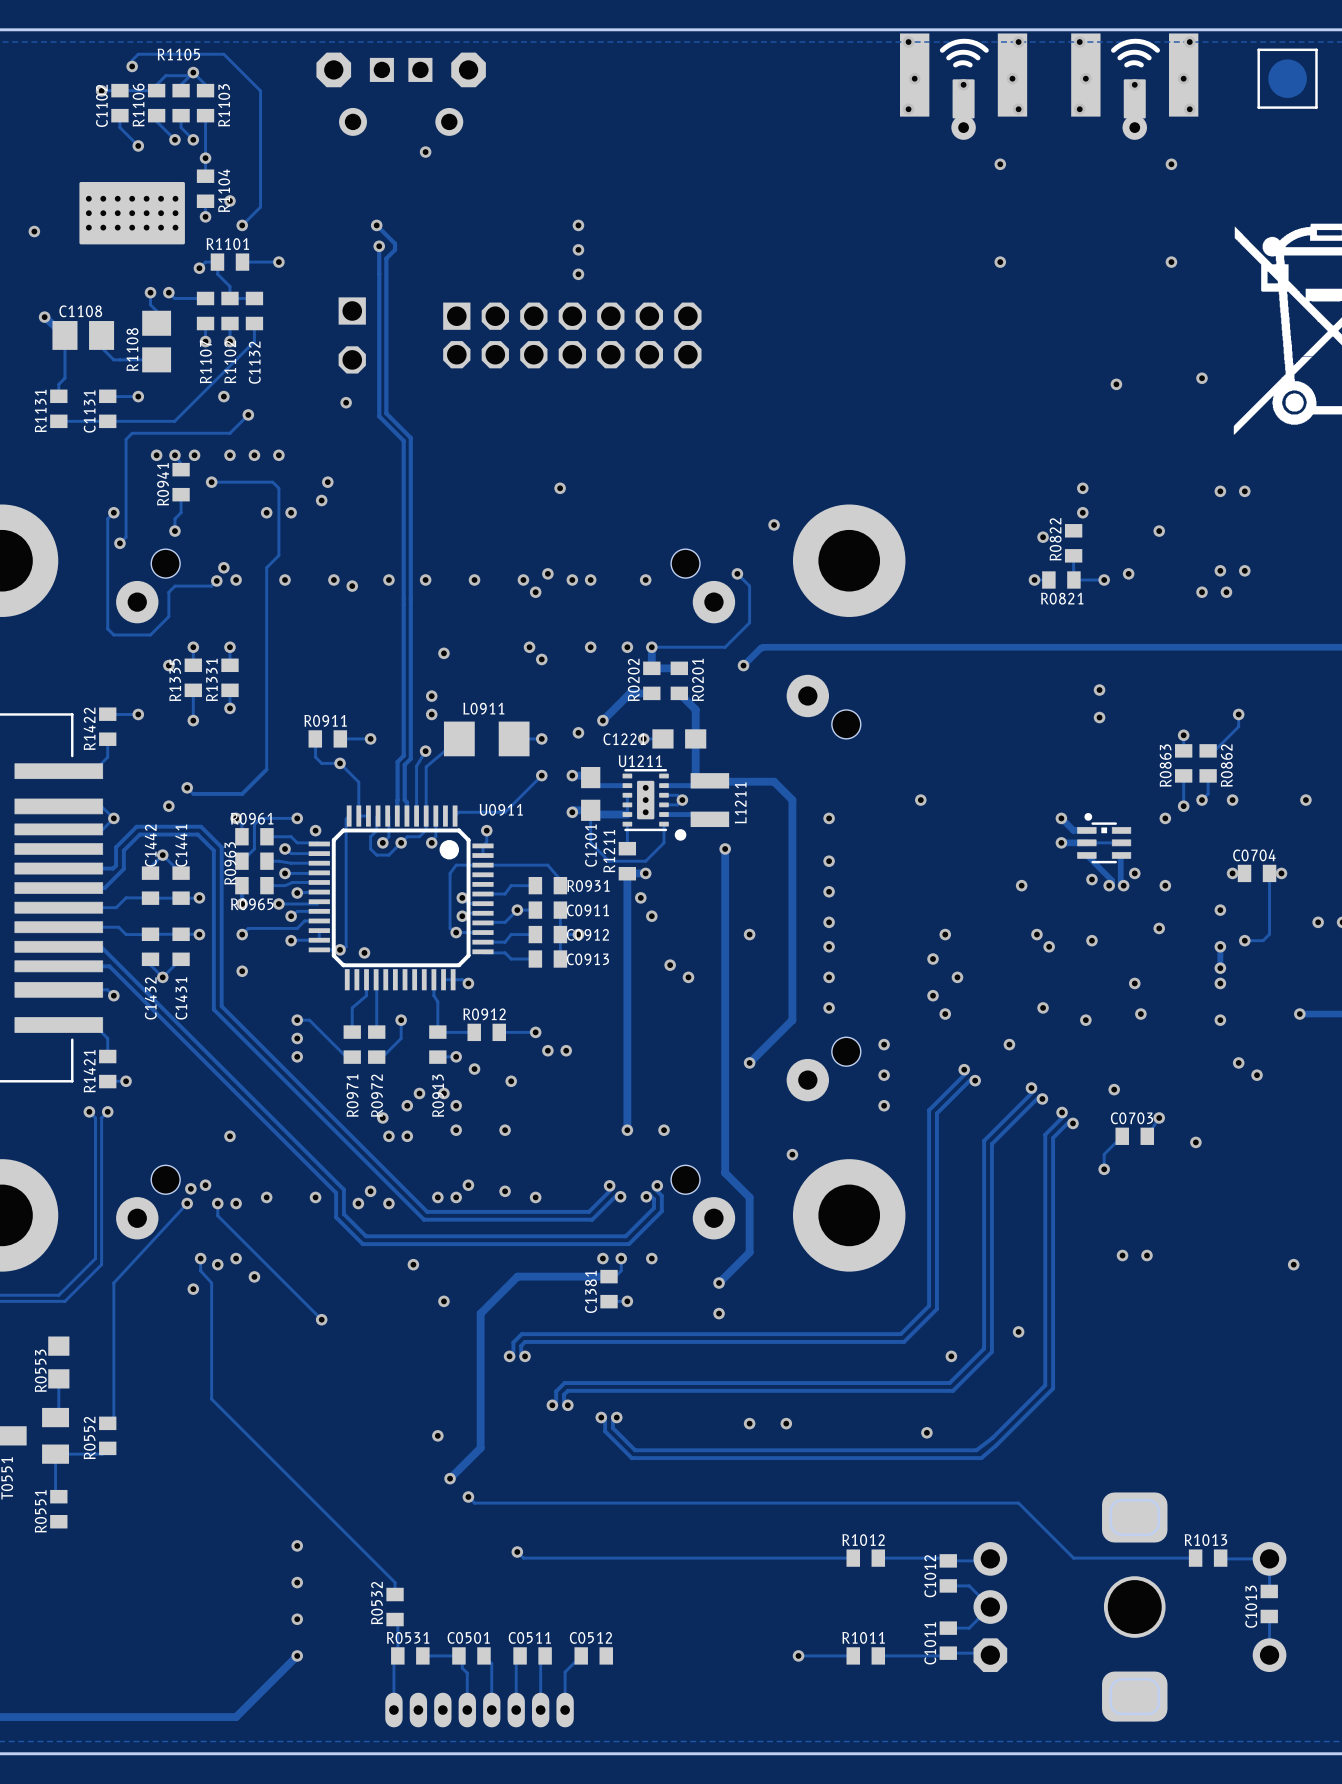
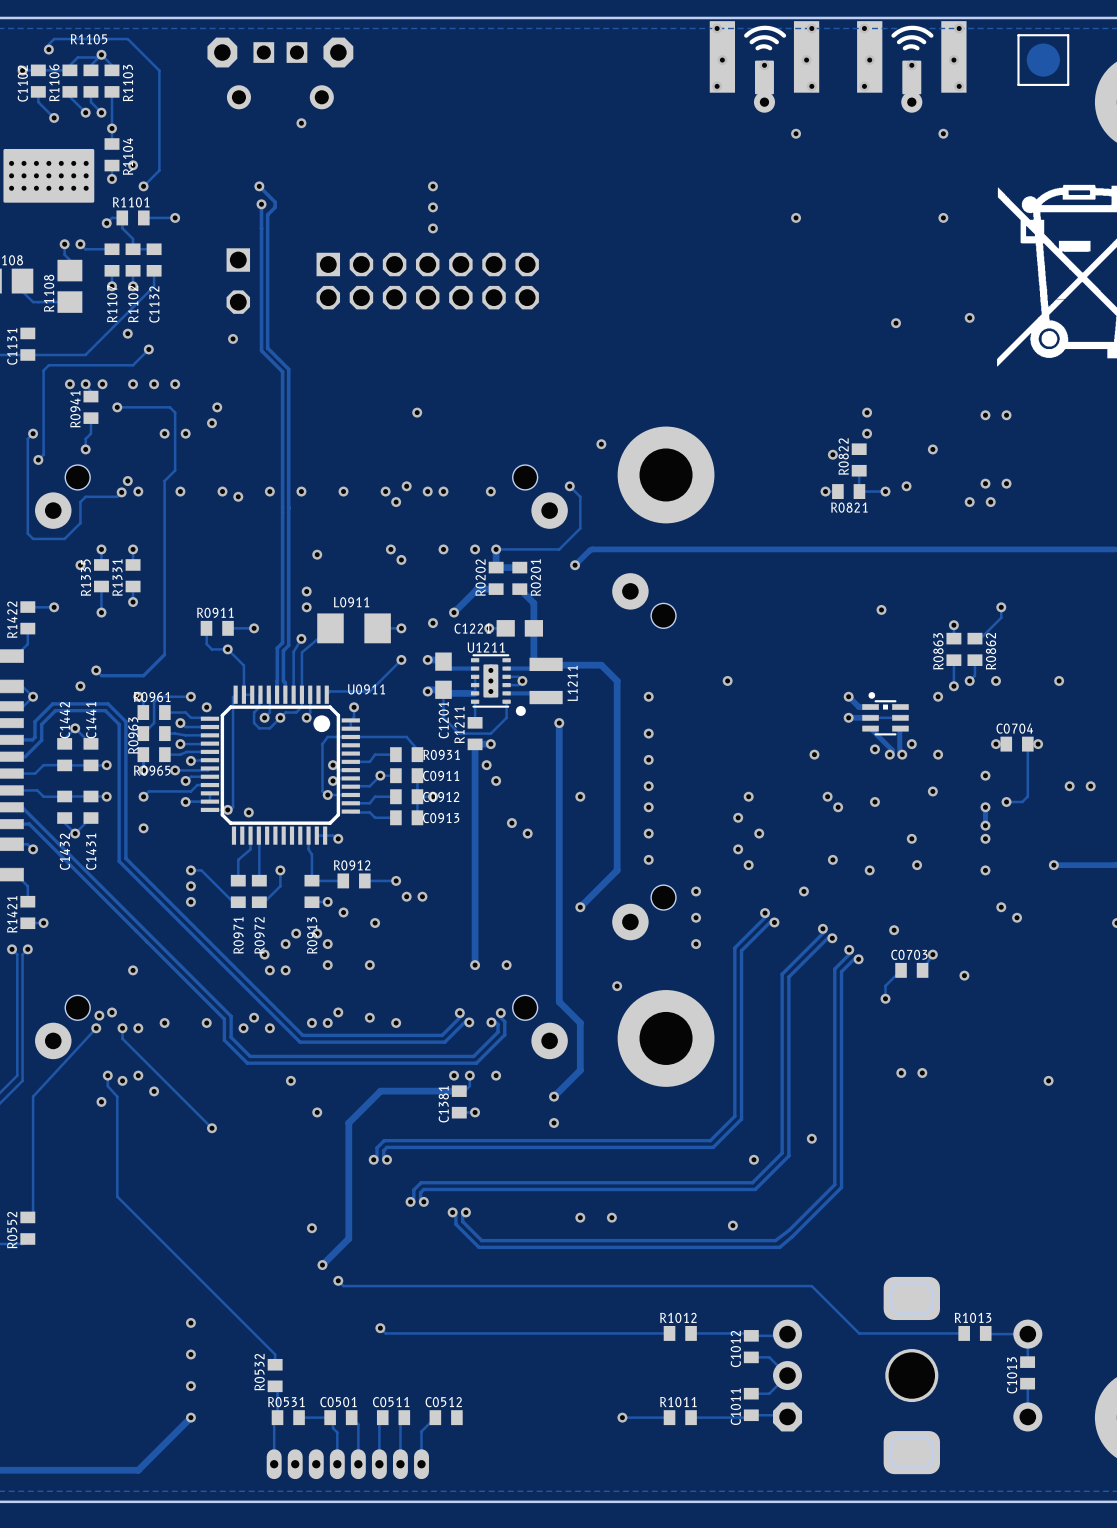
track: (138, 396) (107, 396) -> none
via: (138, 396) -> none
via: (1099, 690) -> none

